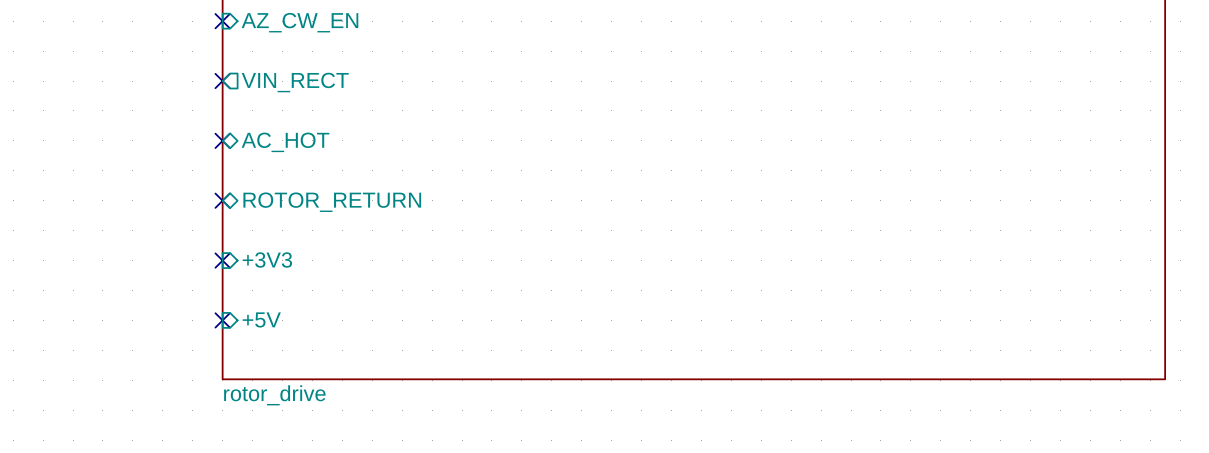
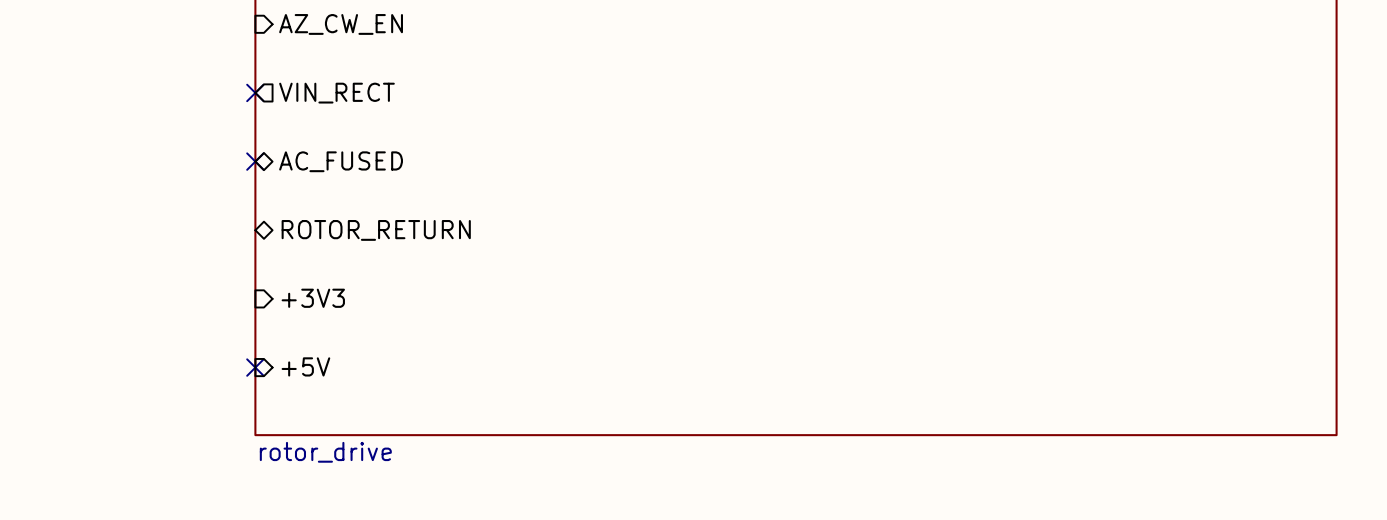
no-connect mark: (222, 21) -> none
sheet pin: AC_HOT (285, 142) -> AC_FUSED (341, 161)
no-connect mark: (222, 200) -> none
no-connect mark: (222, 260) -> none

